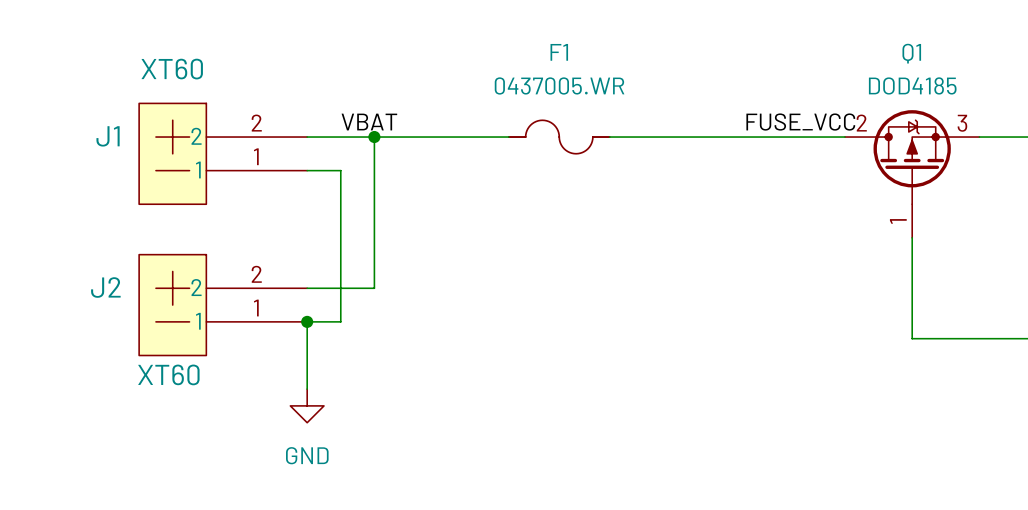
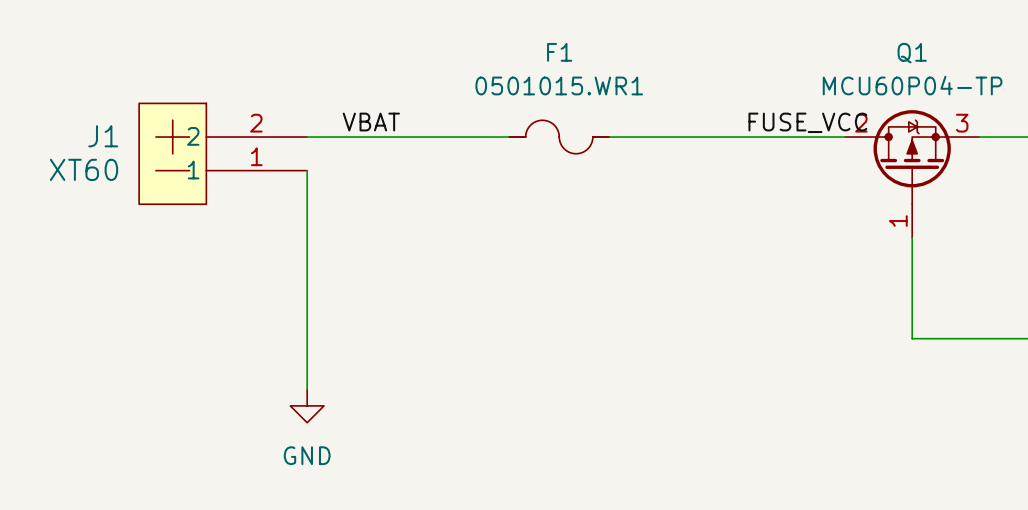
J1 value position: XT60 (172, 69) -> XT60 (84, 169)
F1 value: 0437005.WR (559, 85) -> 0501015.WR1 (559, 85)
Q1 value: DOD4185 (912, 85) -> MCU60P04-TP (912, 85)
wire: (374, 137) (374, 288) (307, 288) -> none
junction: (374, 137) -> none
wire: (307, 170) (340, 170) (340, 321) (307, 321) -> (307, 170) (307, 321)
J2: XT60 (223, 305) -> none
junction: (307, 321) -> none

